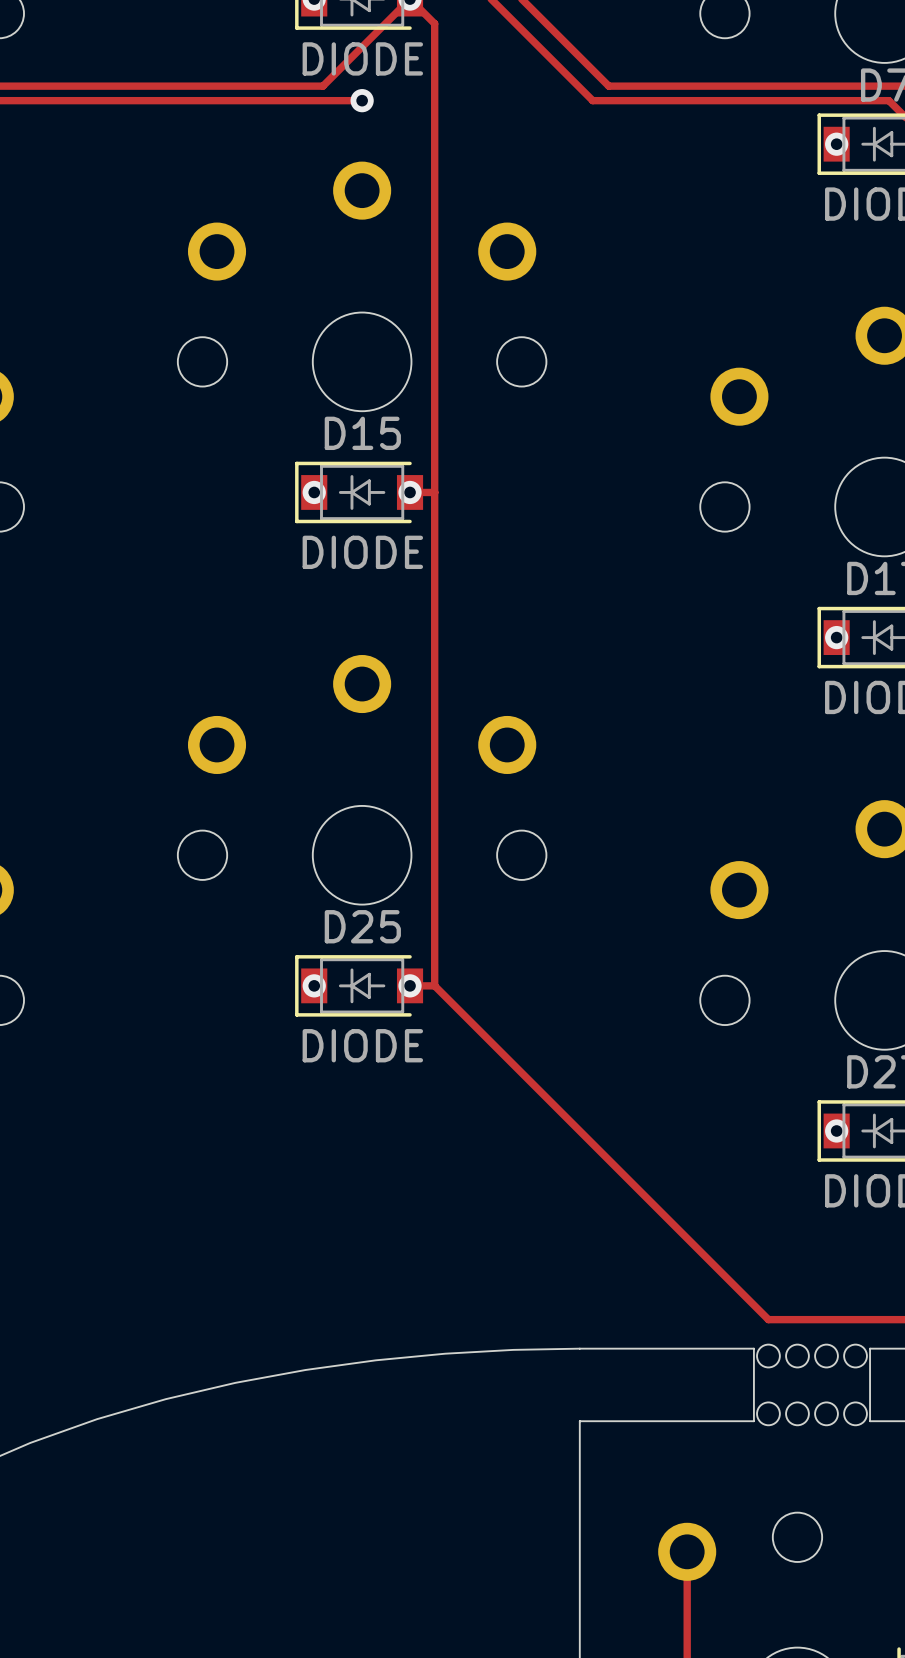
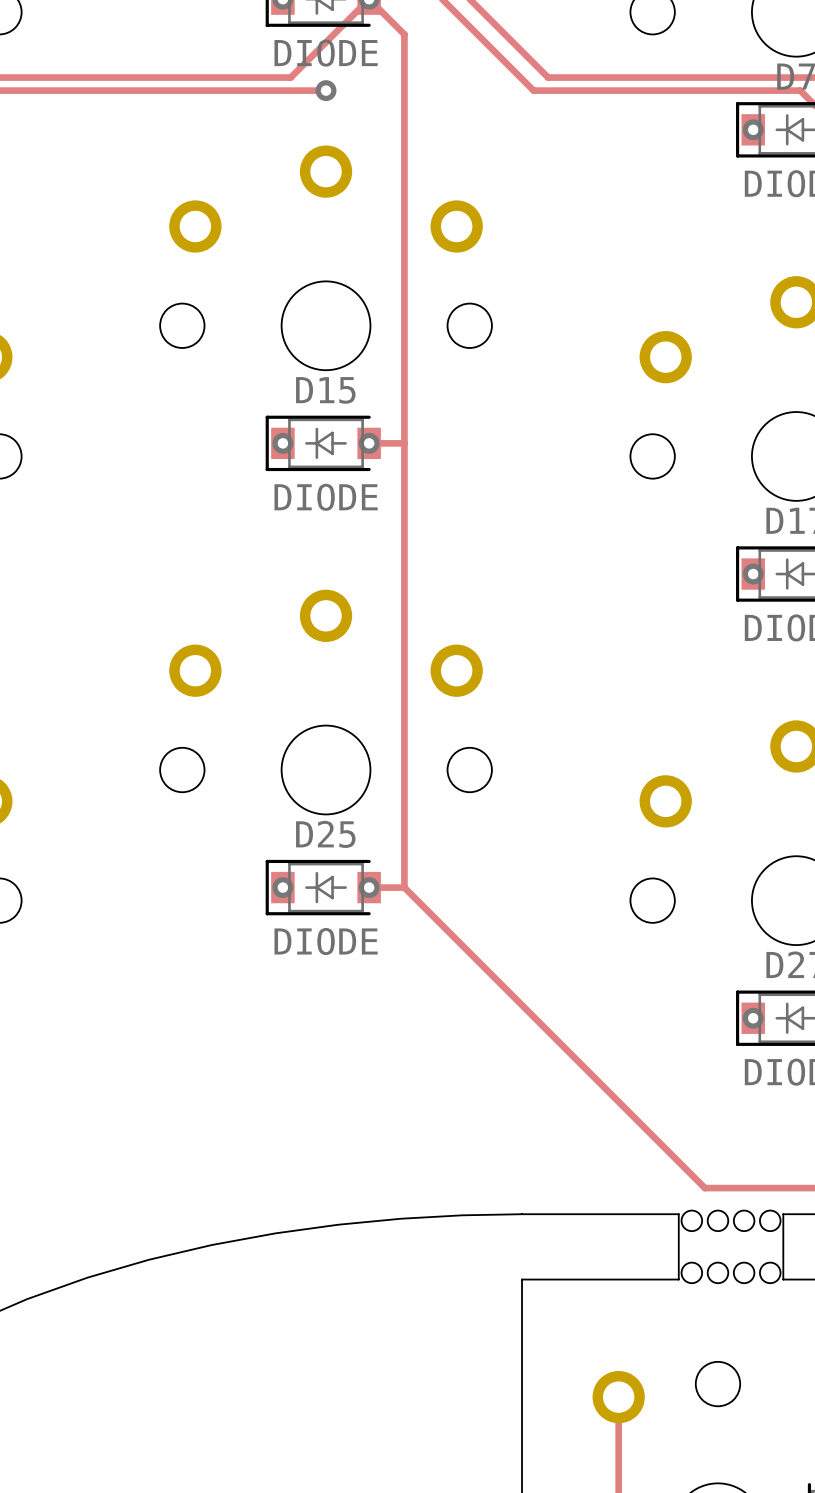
track: (434, 23) (434, 985) (768, 1319) (782, 1319) -> (391, 21) (404, 34) (404, 887)
track: none -> (391, 443) (404, 443)
track: none -> (391, 887) (404, 887)
track: none -> (404, 887) (704, 1188)

